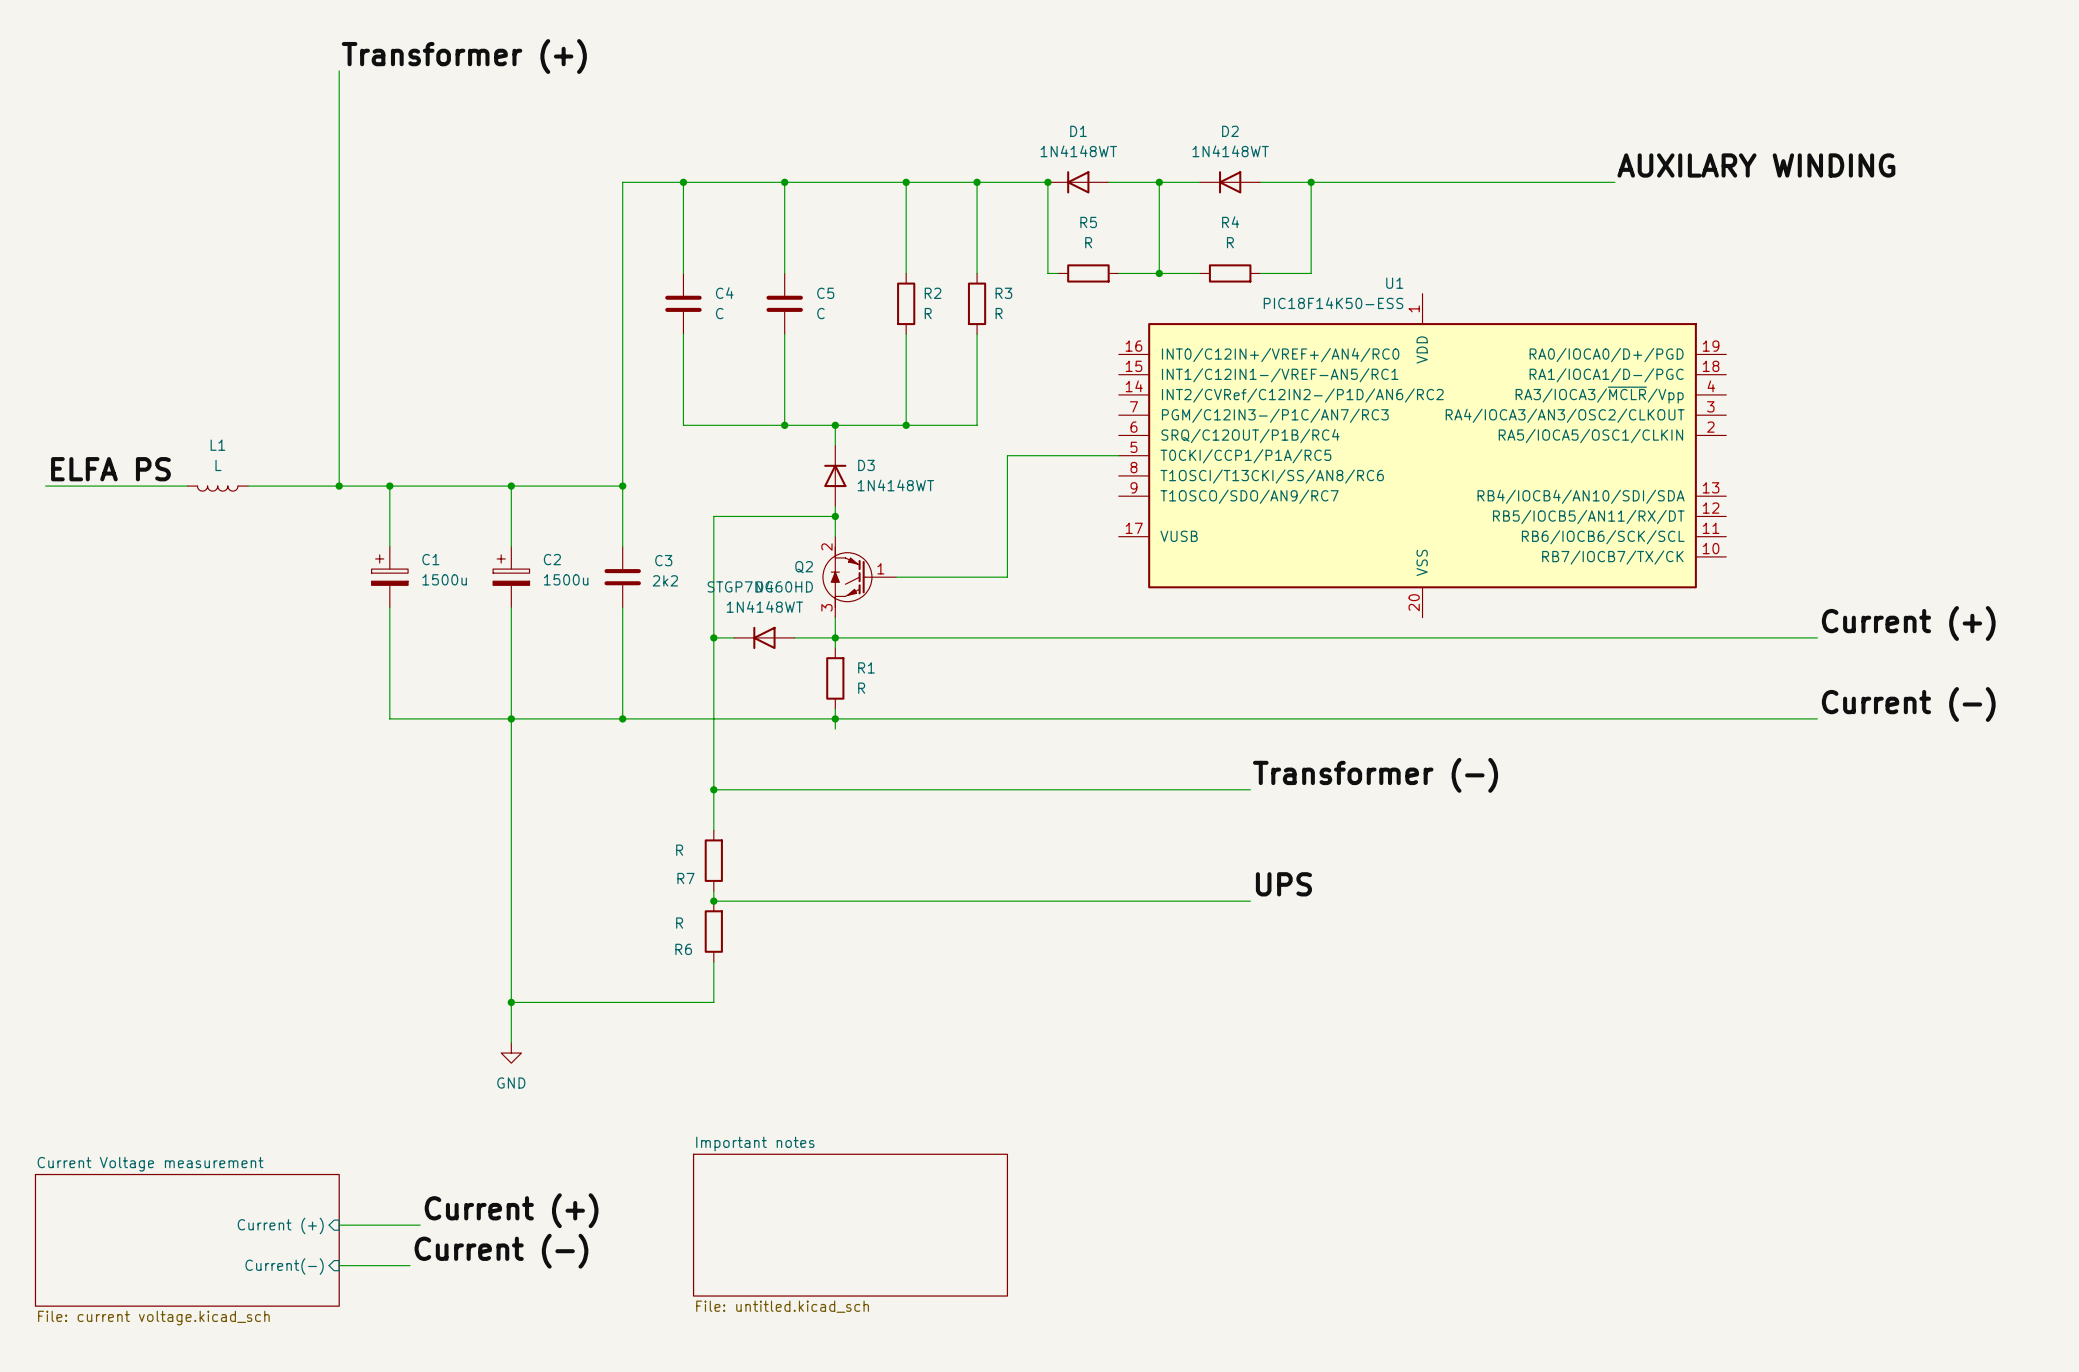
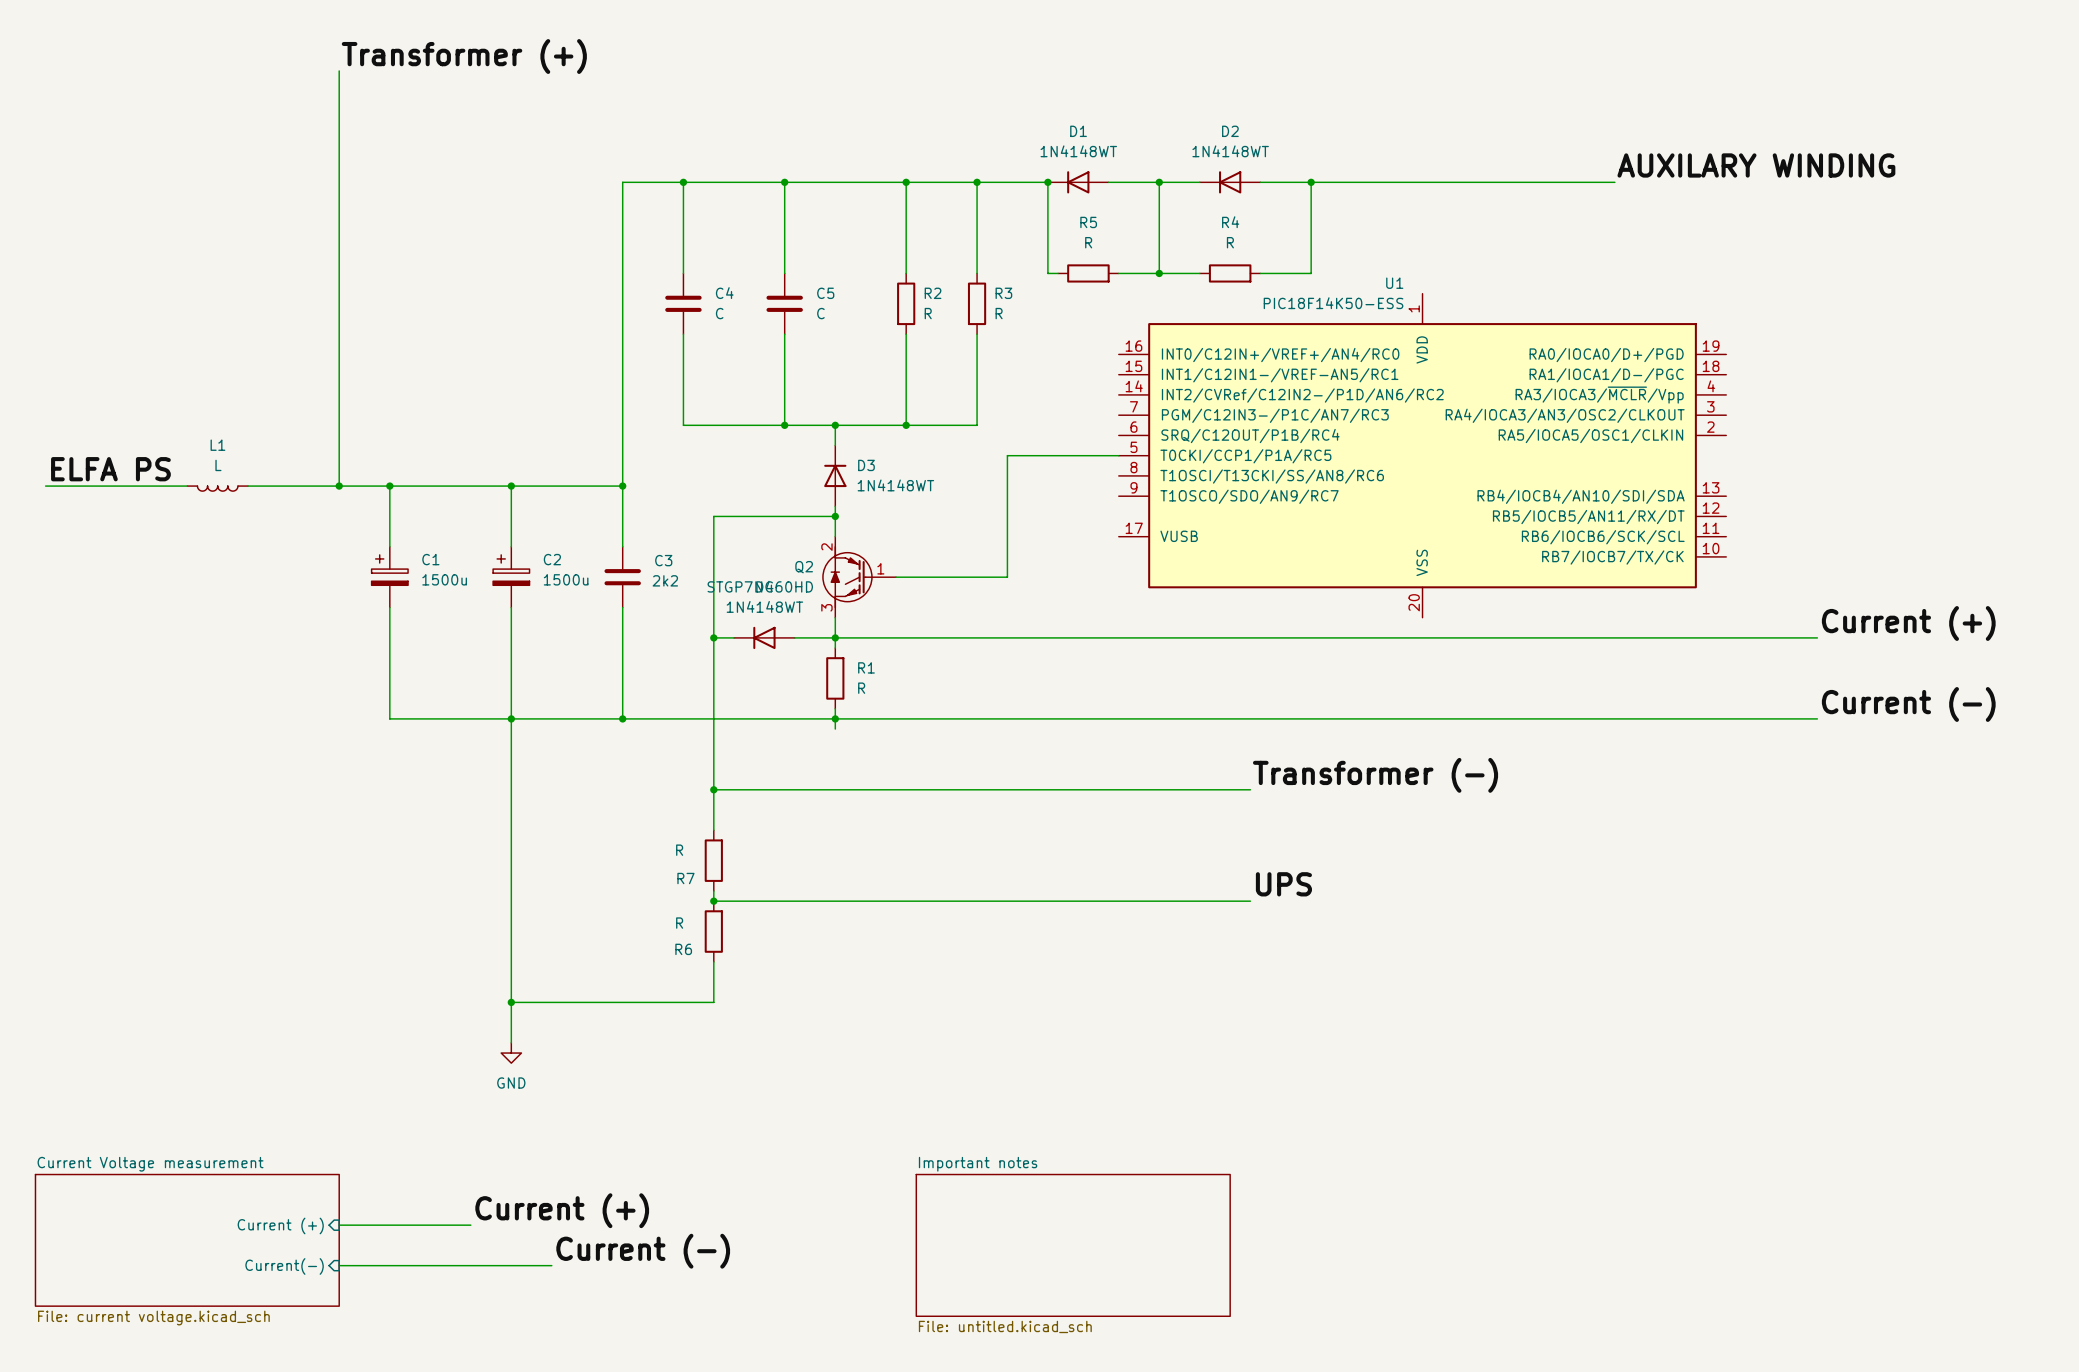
label position: Current (+) (511, 1210) -> Current (+) (562, 1210)
wire: none -> (420, 1225) (470, 1225)
sheet Important notes: File: untitled.kicad_sch (850, 1225) -> none
sheet Important notes: none -> File: untitled.kicad_sch (1073, 1245)
label position: Current (-) (501, 1251) -> Current (-) (643, 1251)
wire: none -> (410, 1265) (551, 1265)

